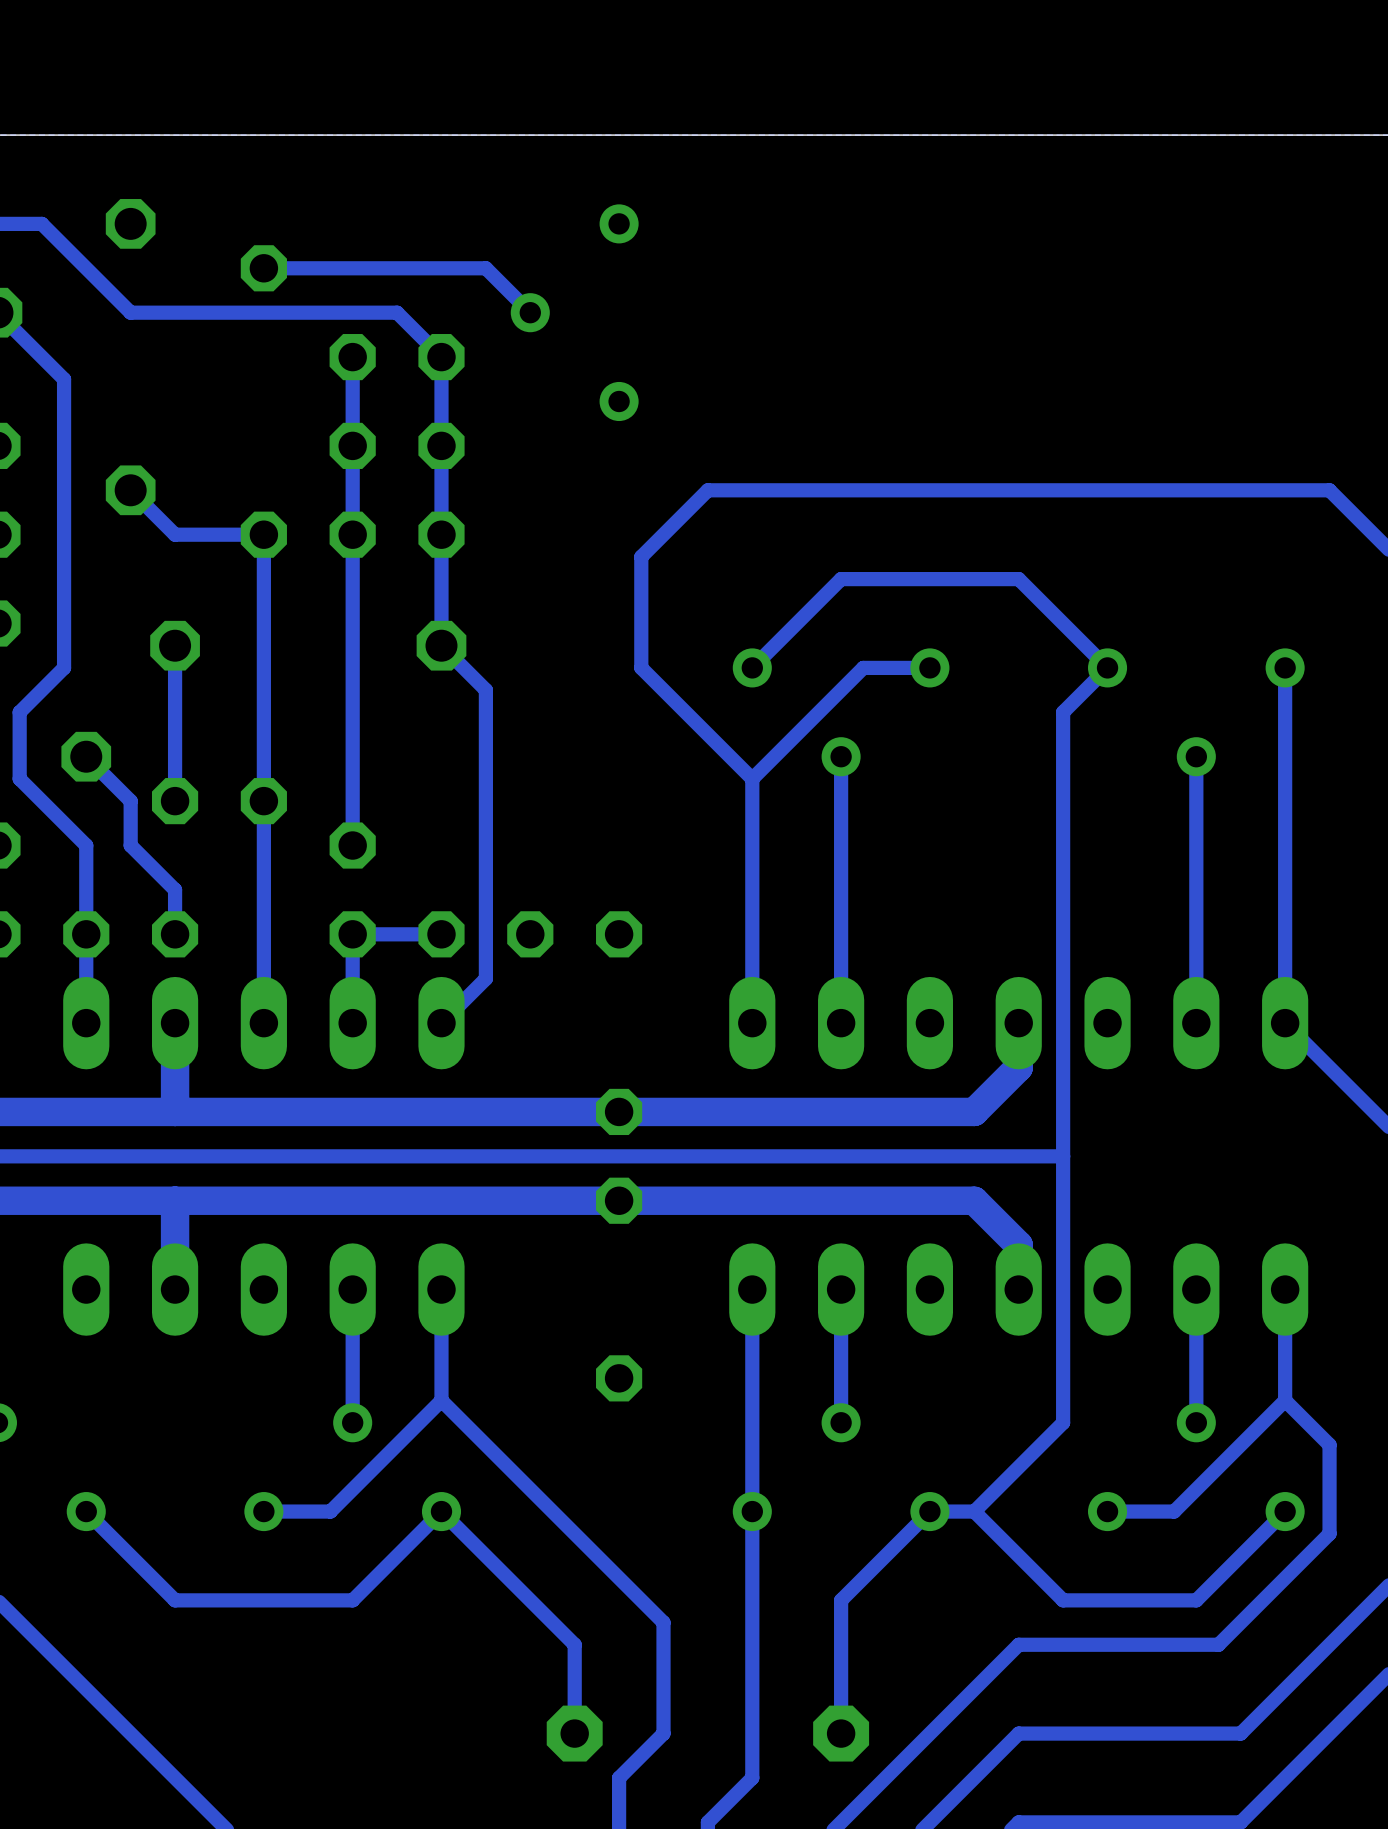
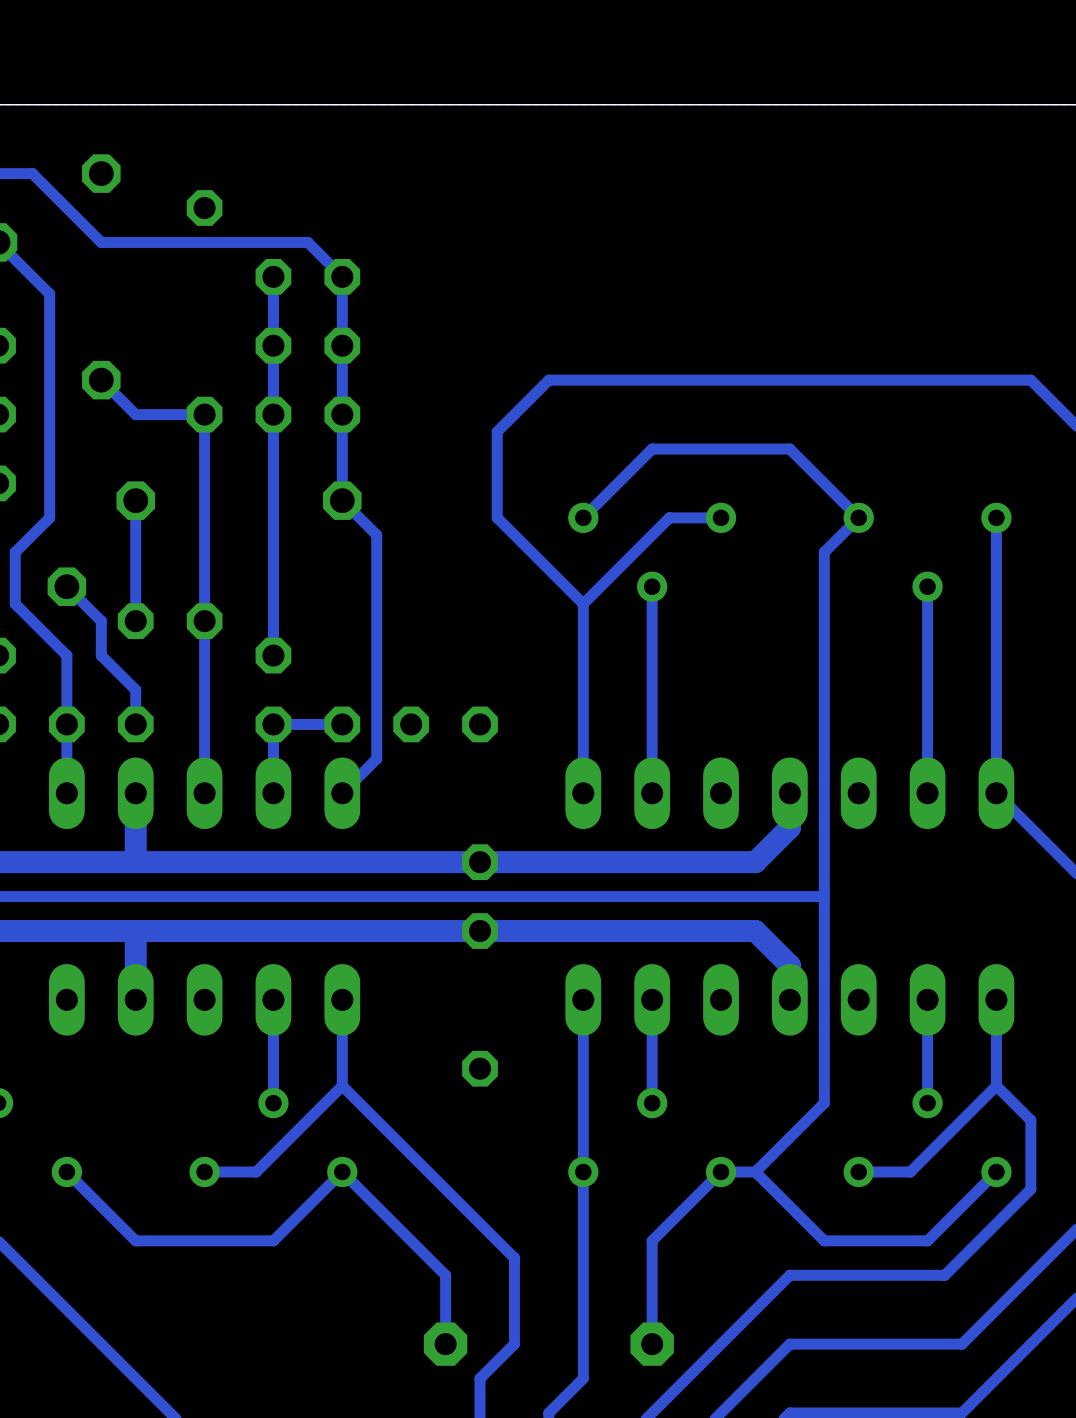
bottom track: (263, 268) (485, 268) (530, 312) -> none
part: (574, 312) -> none

